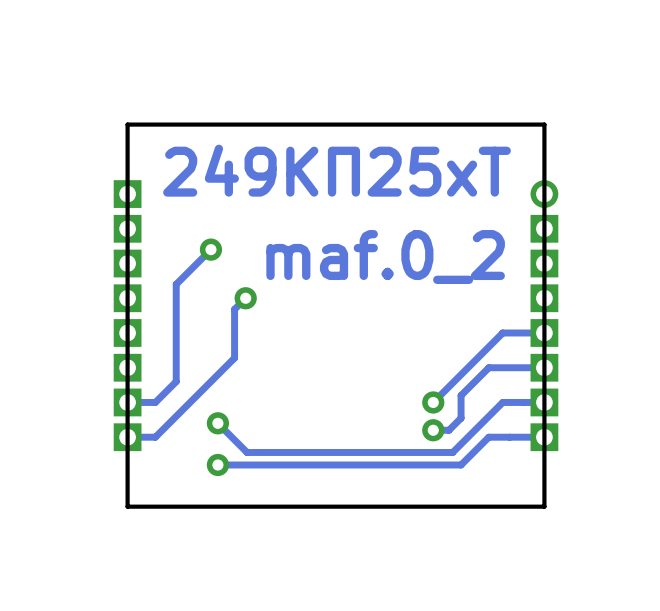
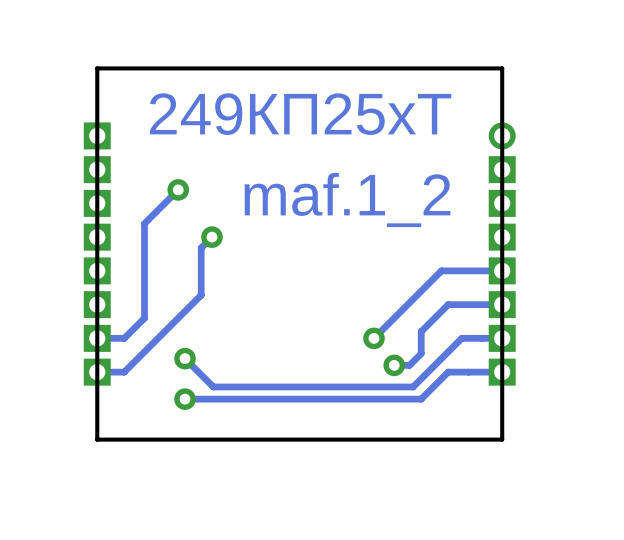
text: maf.0_2 (385, 257) -> maf.1_2 (347, 199)
track: (502, 332) (433, 402) -> (461, 270) (441, 270) (373, 338)
via position: (433, 402) -> (373, 338)

